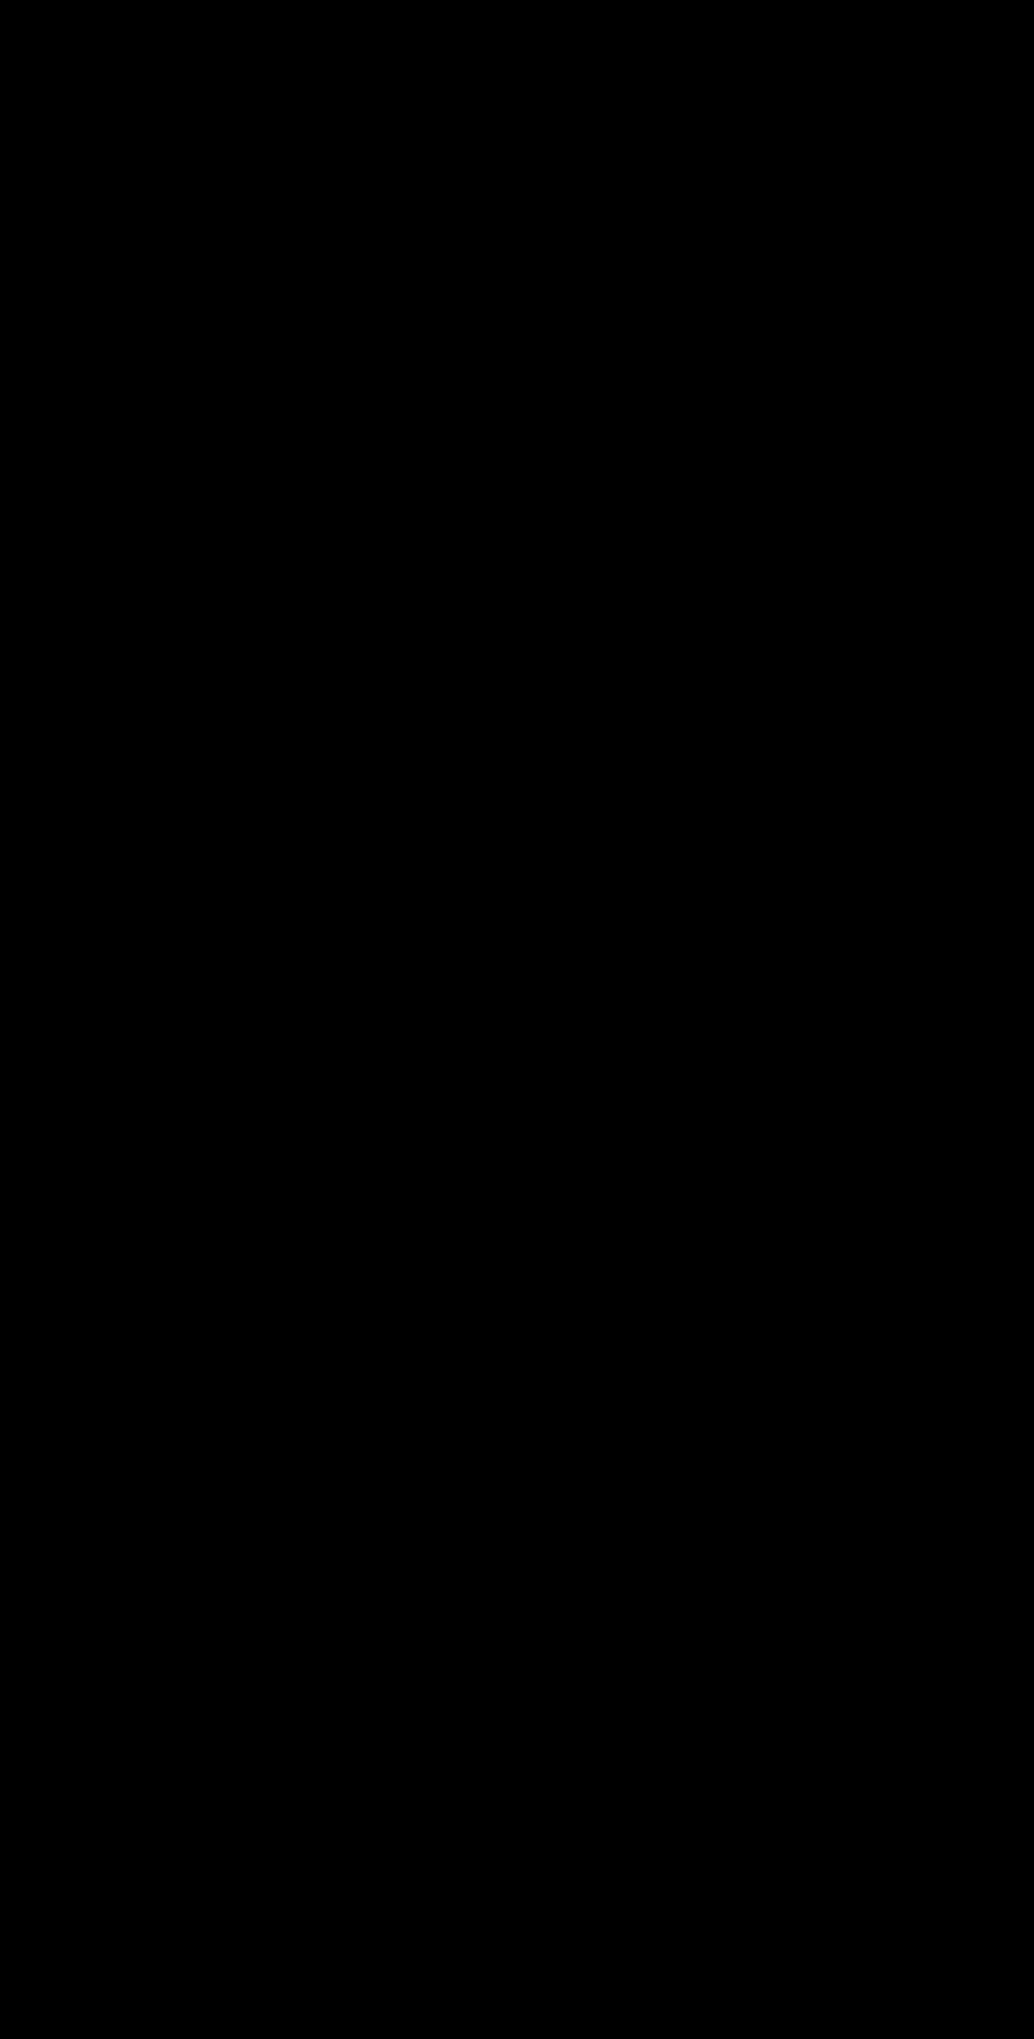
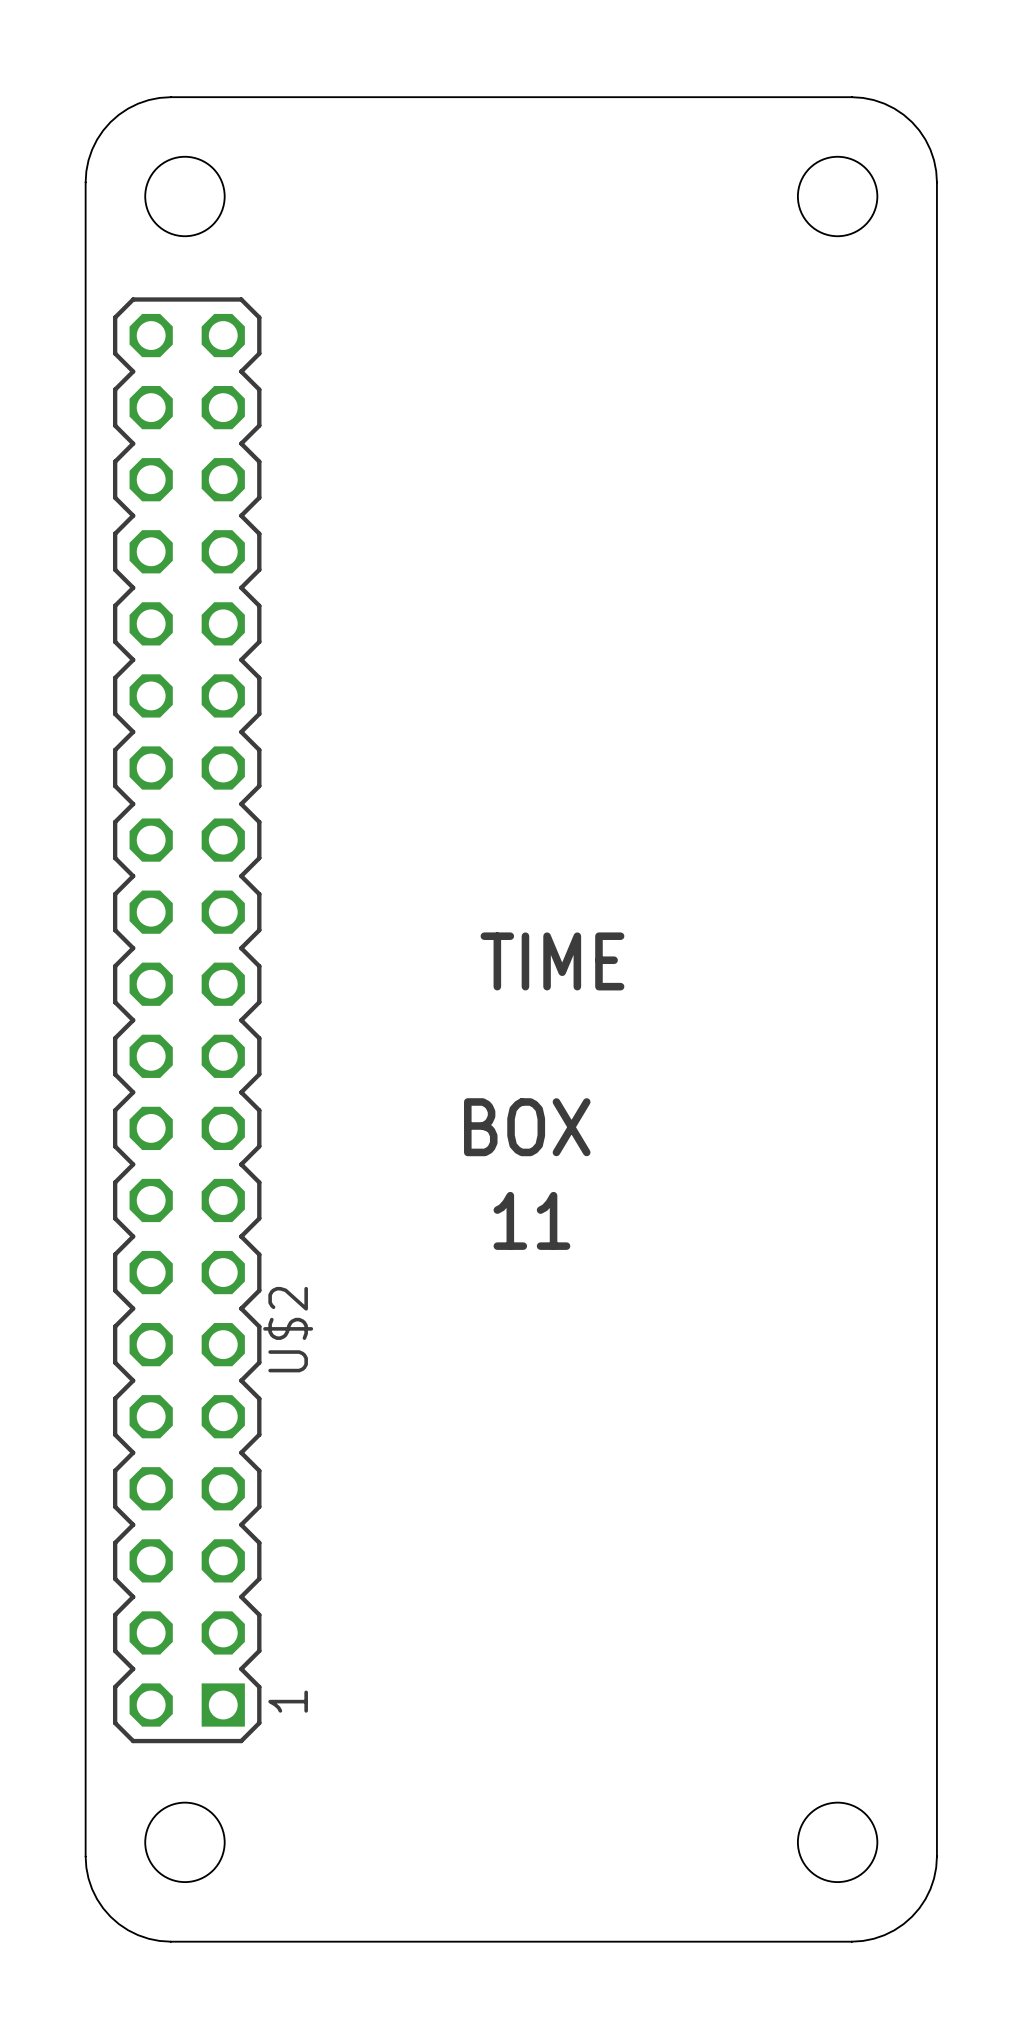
text: none -> TIME (552, 961)
U$2: none -> (511, 1019)
text: none -> BOX (527, 1127)
text: none -> 11 (531, 1220)

